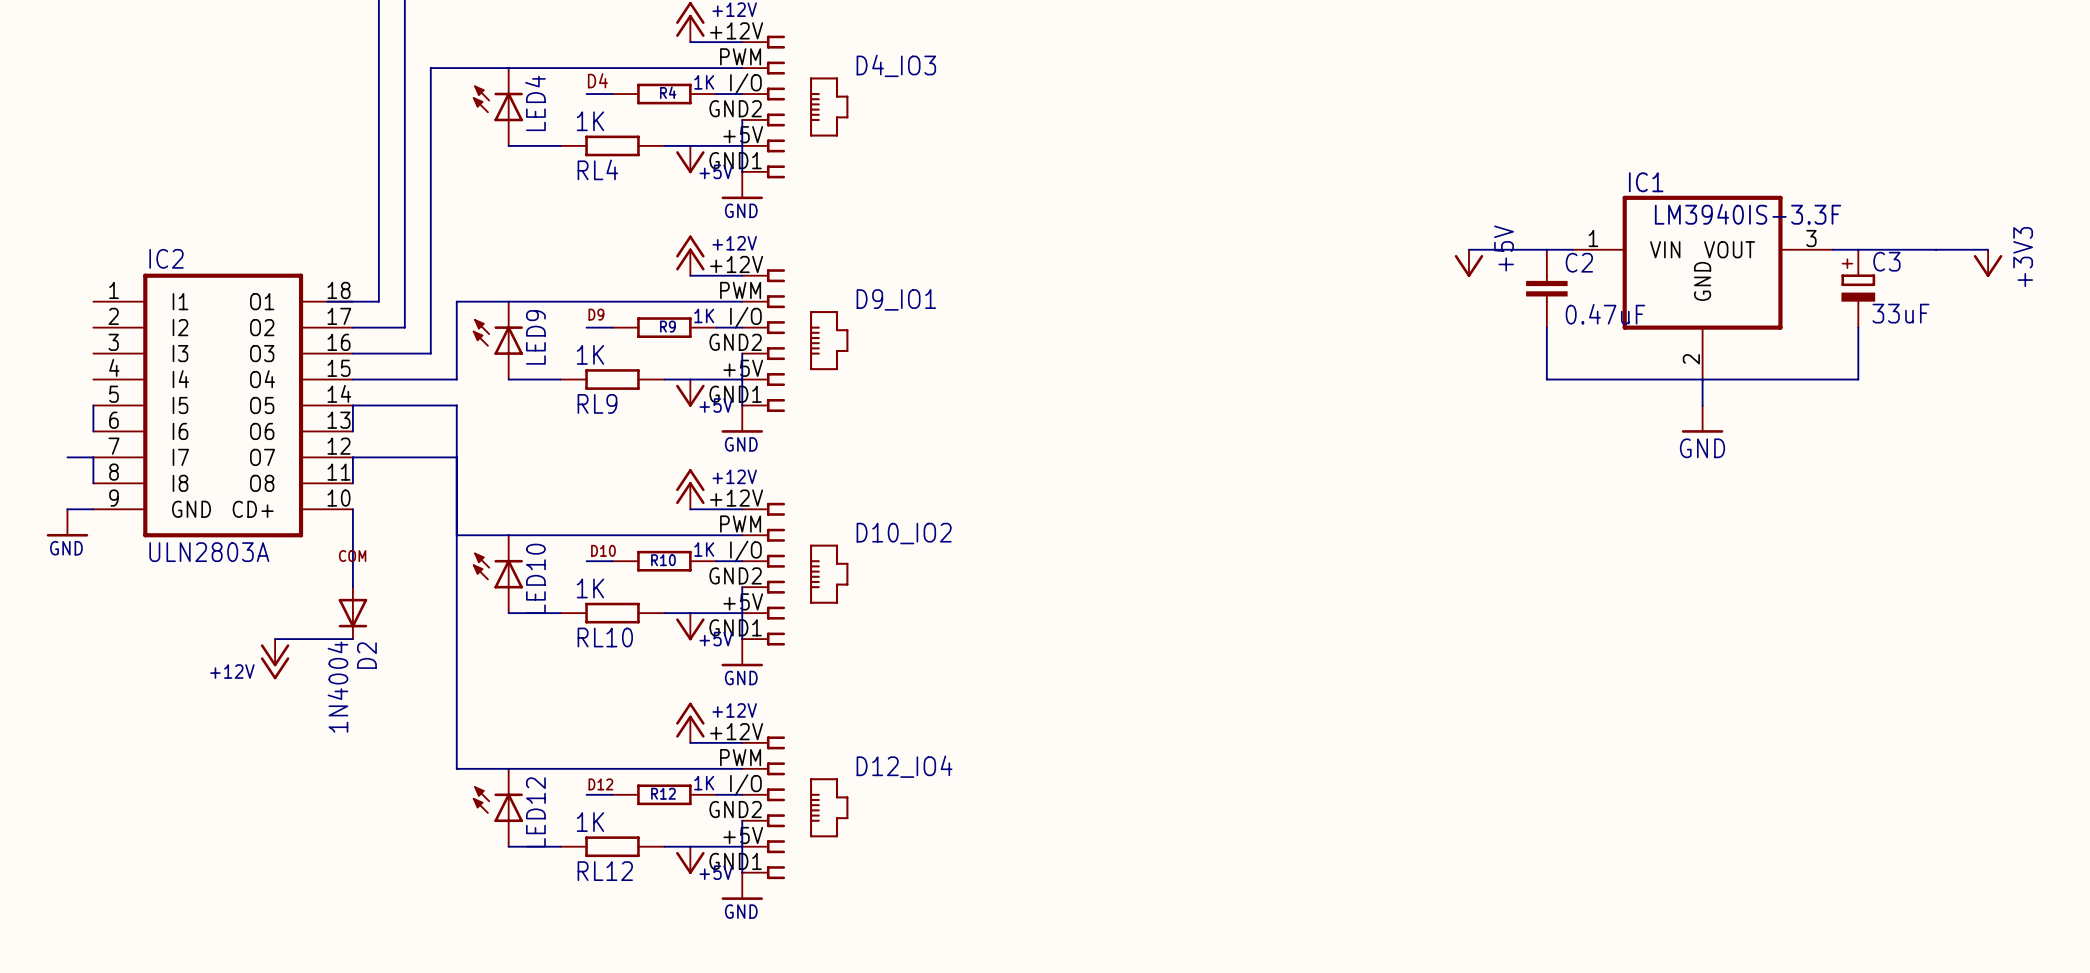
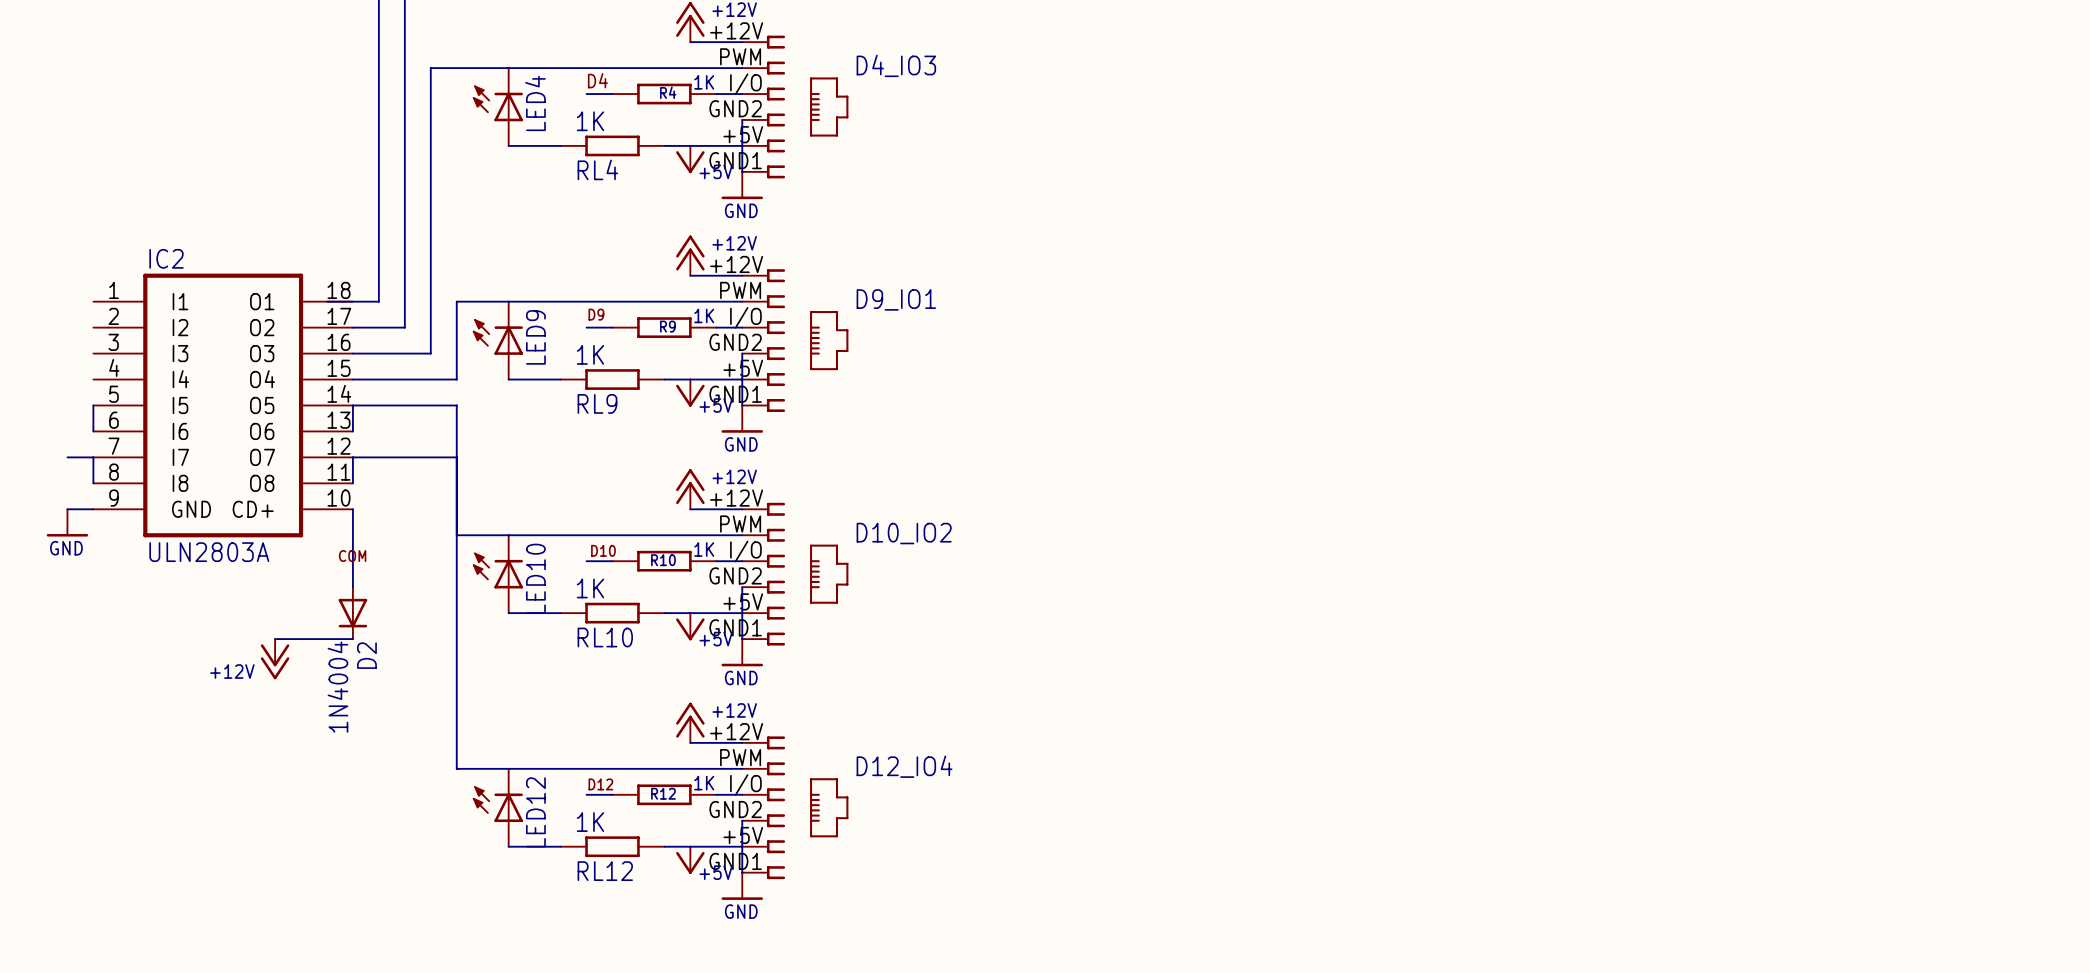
wire: (1468, 249) (1572, 249) -> none
wire: (1832, 249) (1988, 249) -> none
power symbol: +5V (1468, 263) -> none
power symbol: +3V3 (1988, 263) -> none
IC1: LM3940IS-3.3F (1702, 287) -> none
C2: 0.47uF (1546, 288) -> none
C3: 33uF (1858, 288) -> none
wire: (1546, 327) (1546, 379) (1858, 379) (1858, 327) -> none
wire: (1702, 379) (1702, 405) -> none
power symbol: GND (1702, 419) -> none

